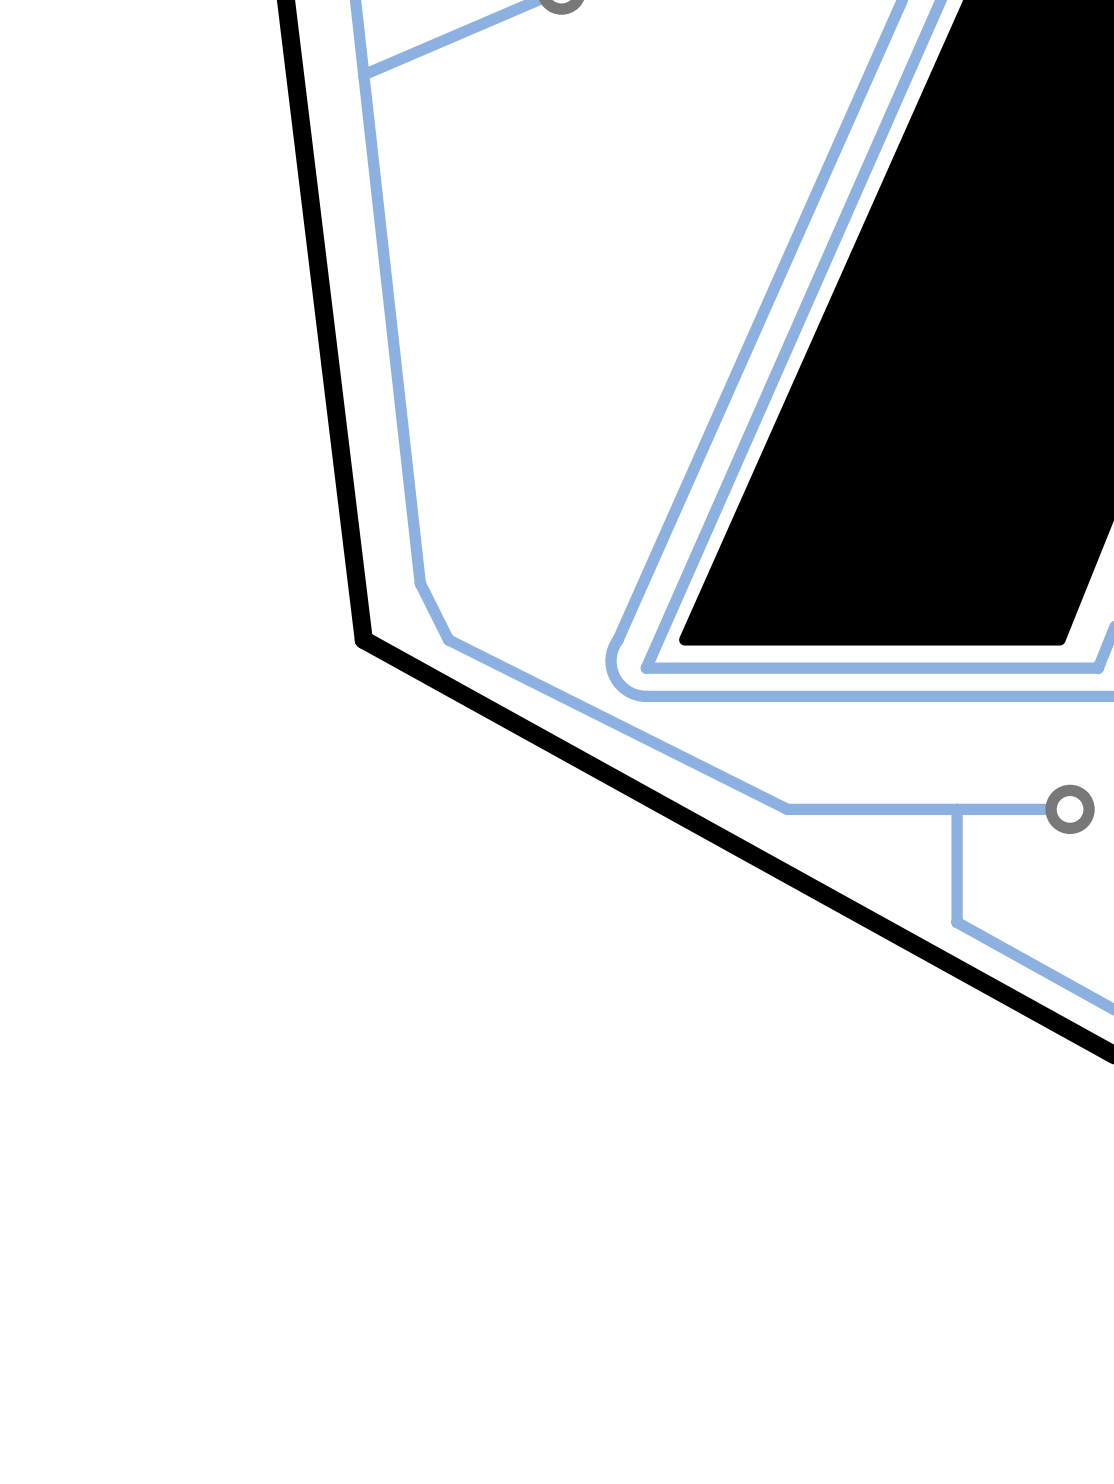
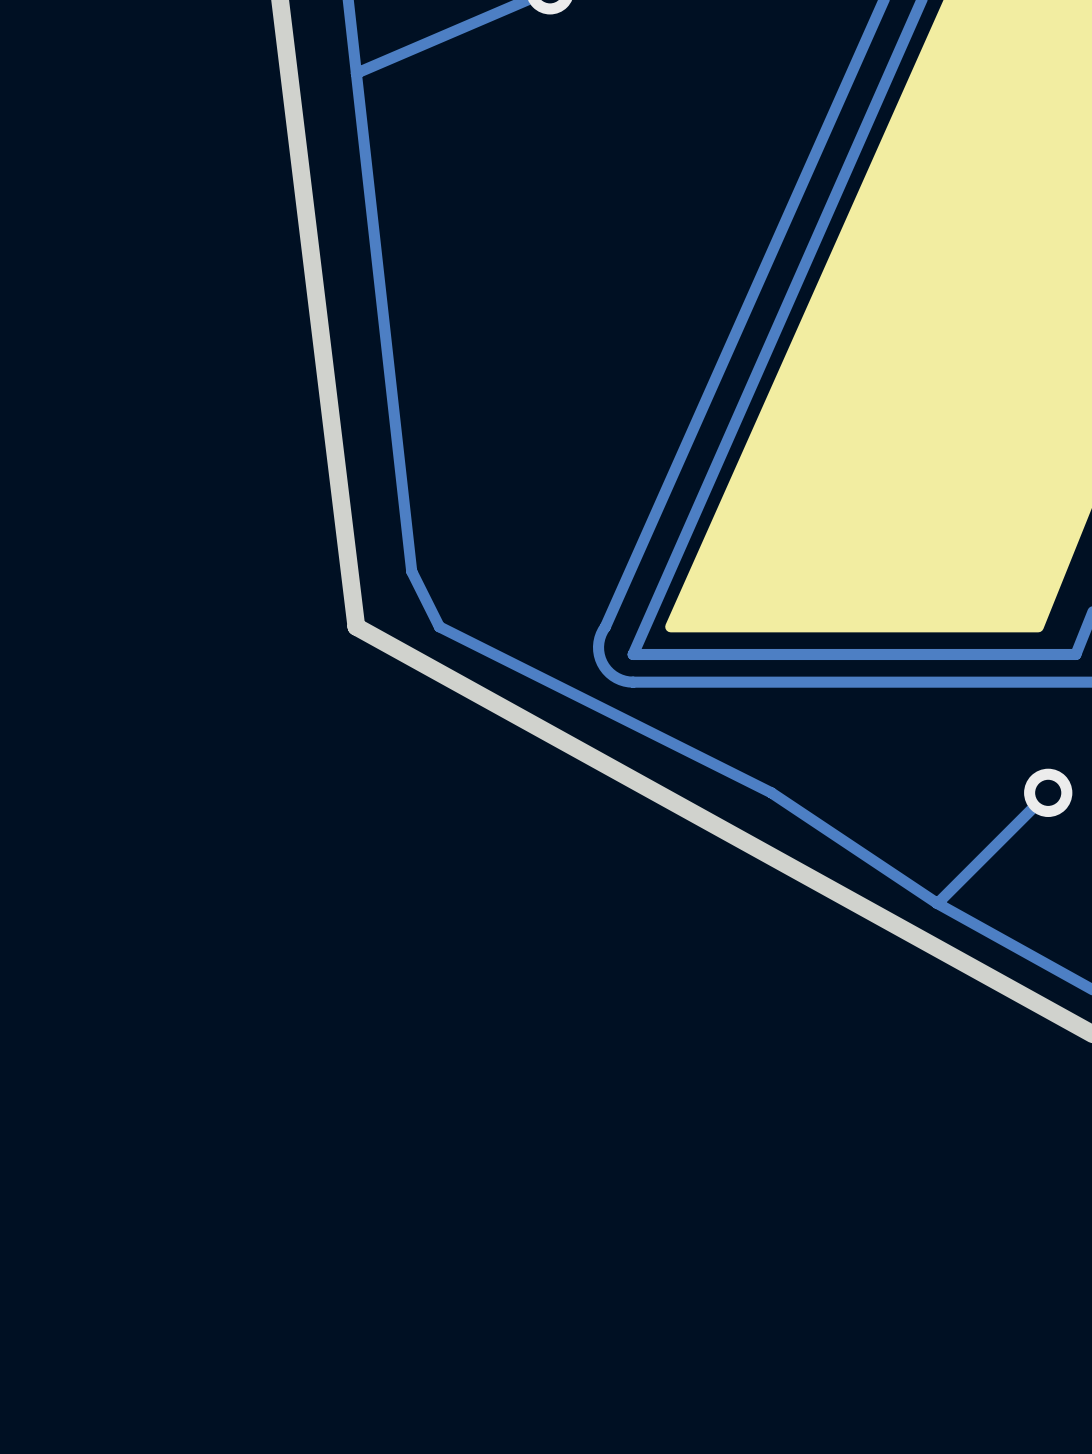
track: (957, 809) (957, 922) -> none
track: (1070, 809) (787, 809) -> (1048, 792) (937, 903) (771, 792)

